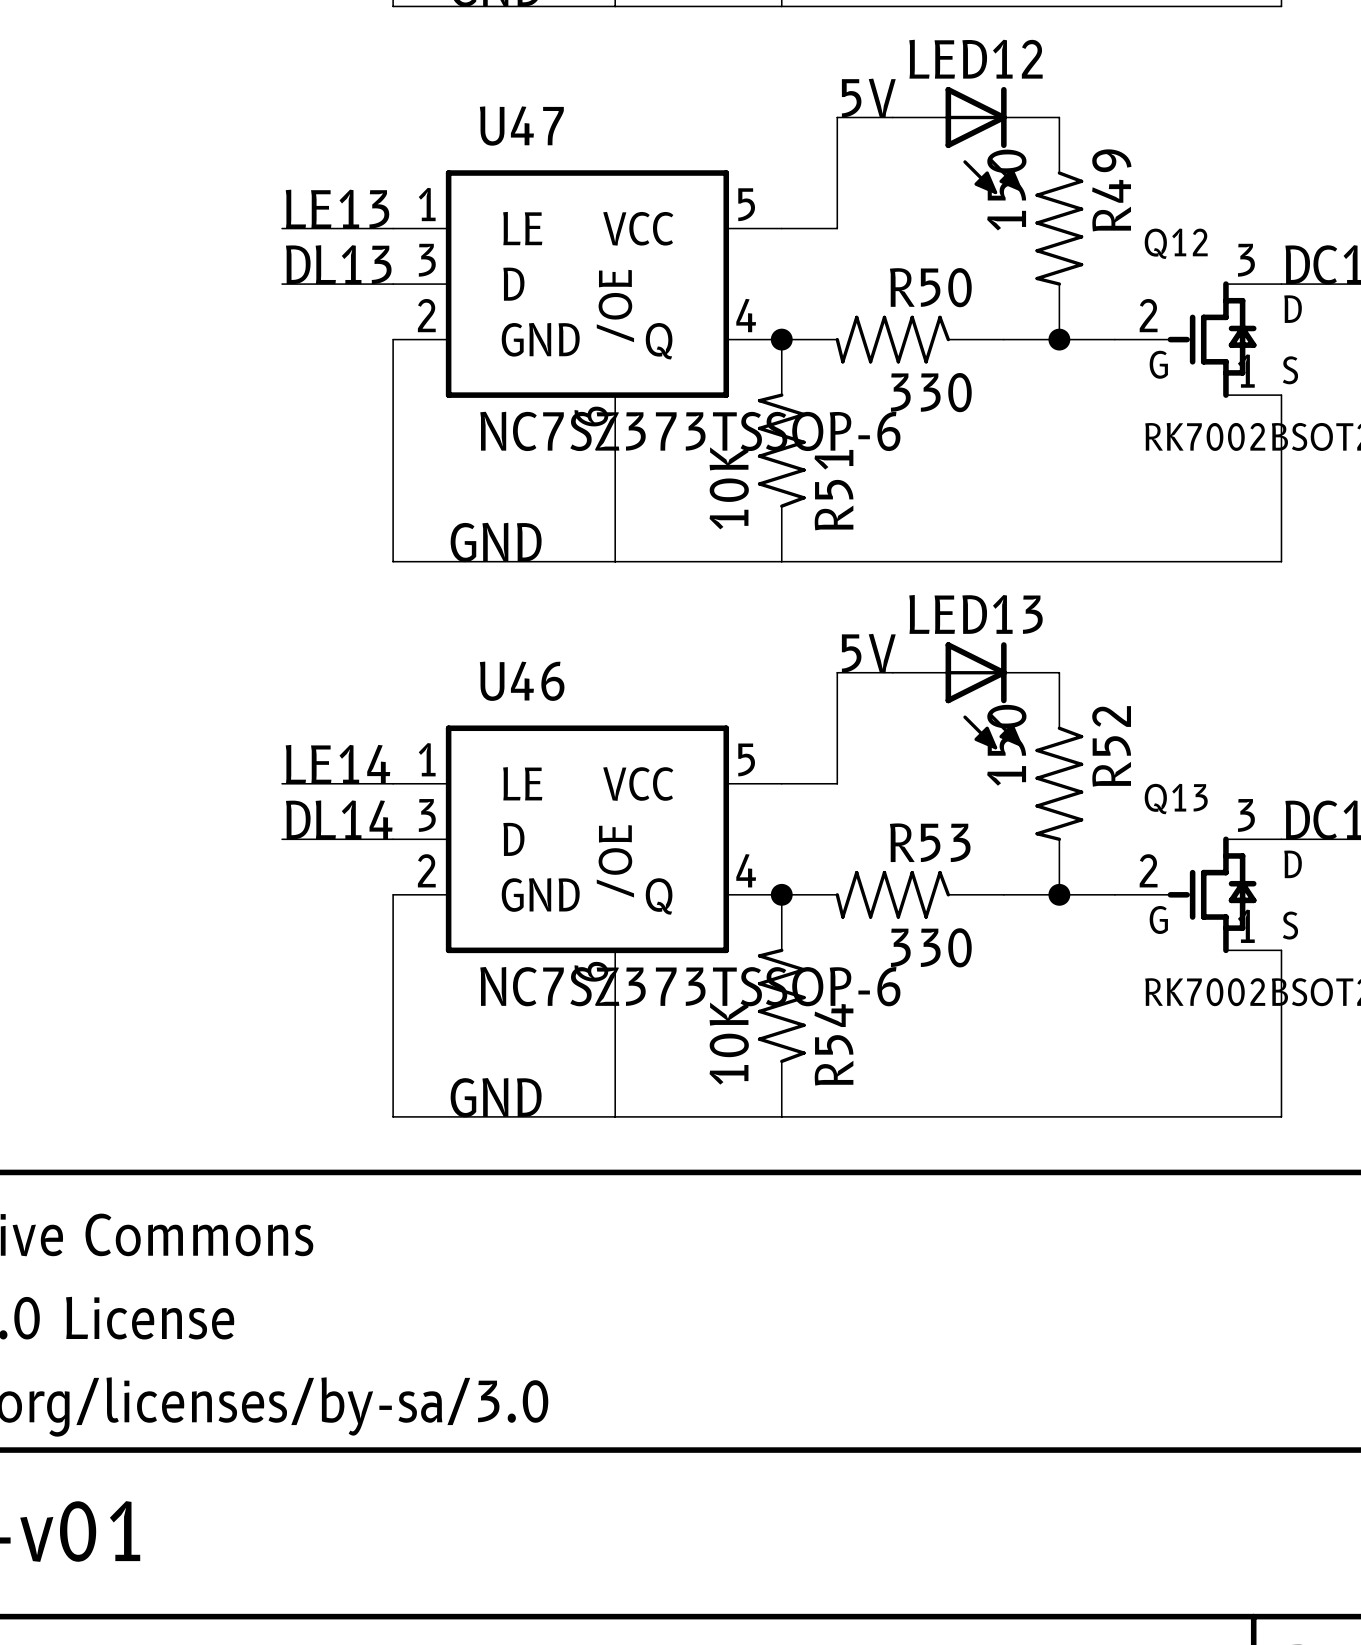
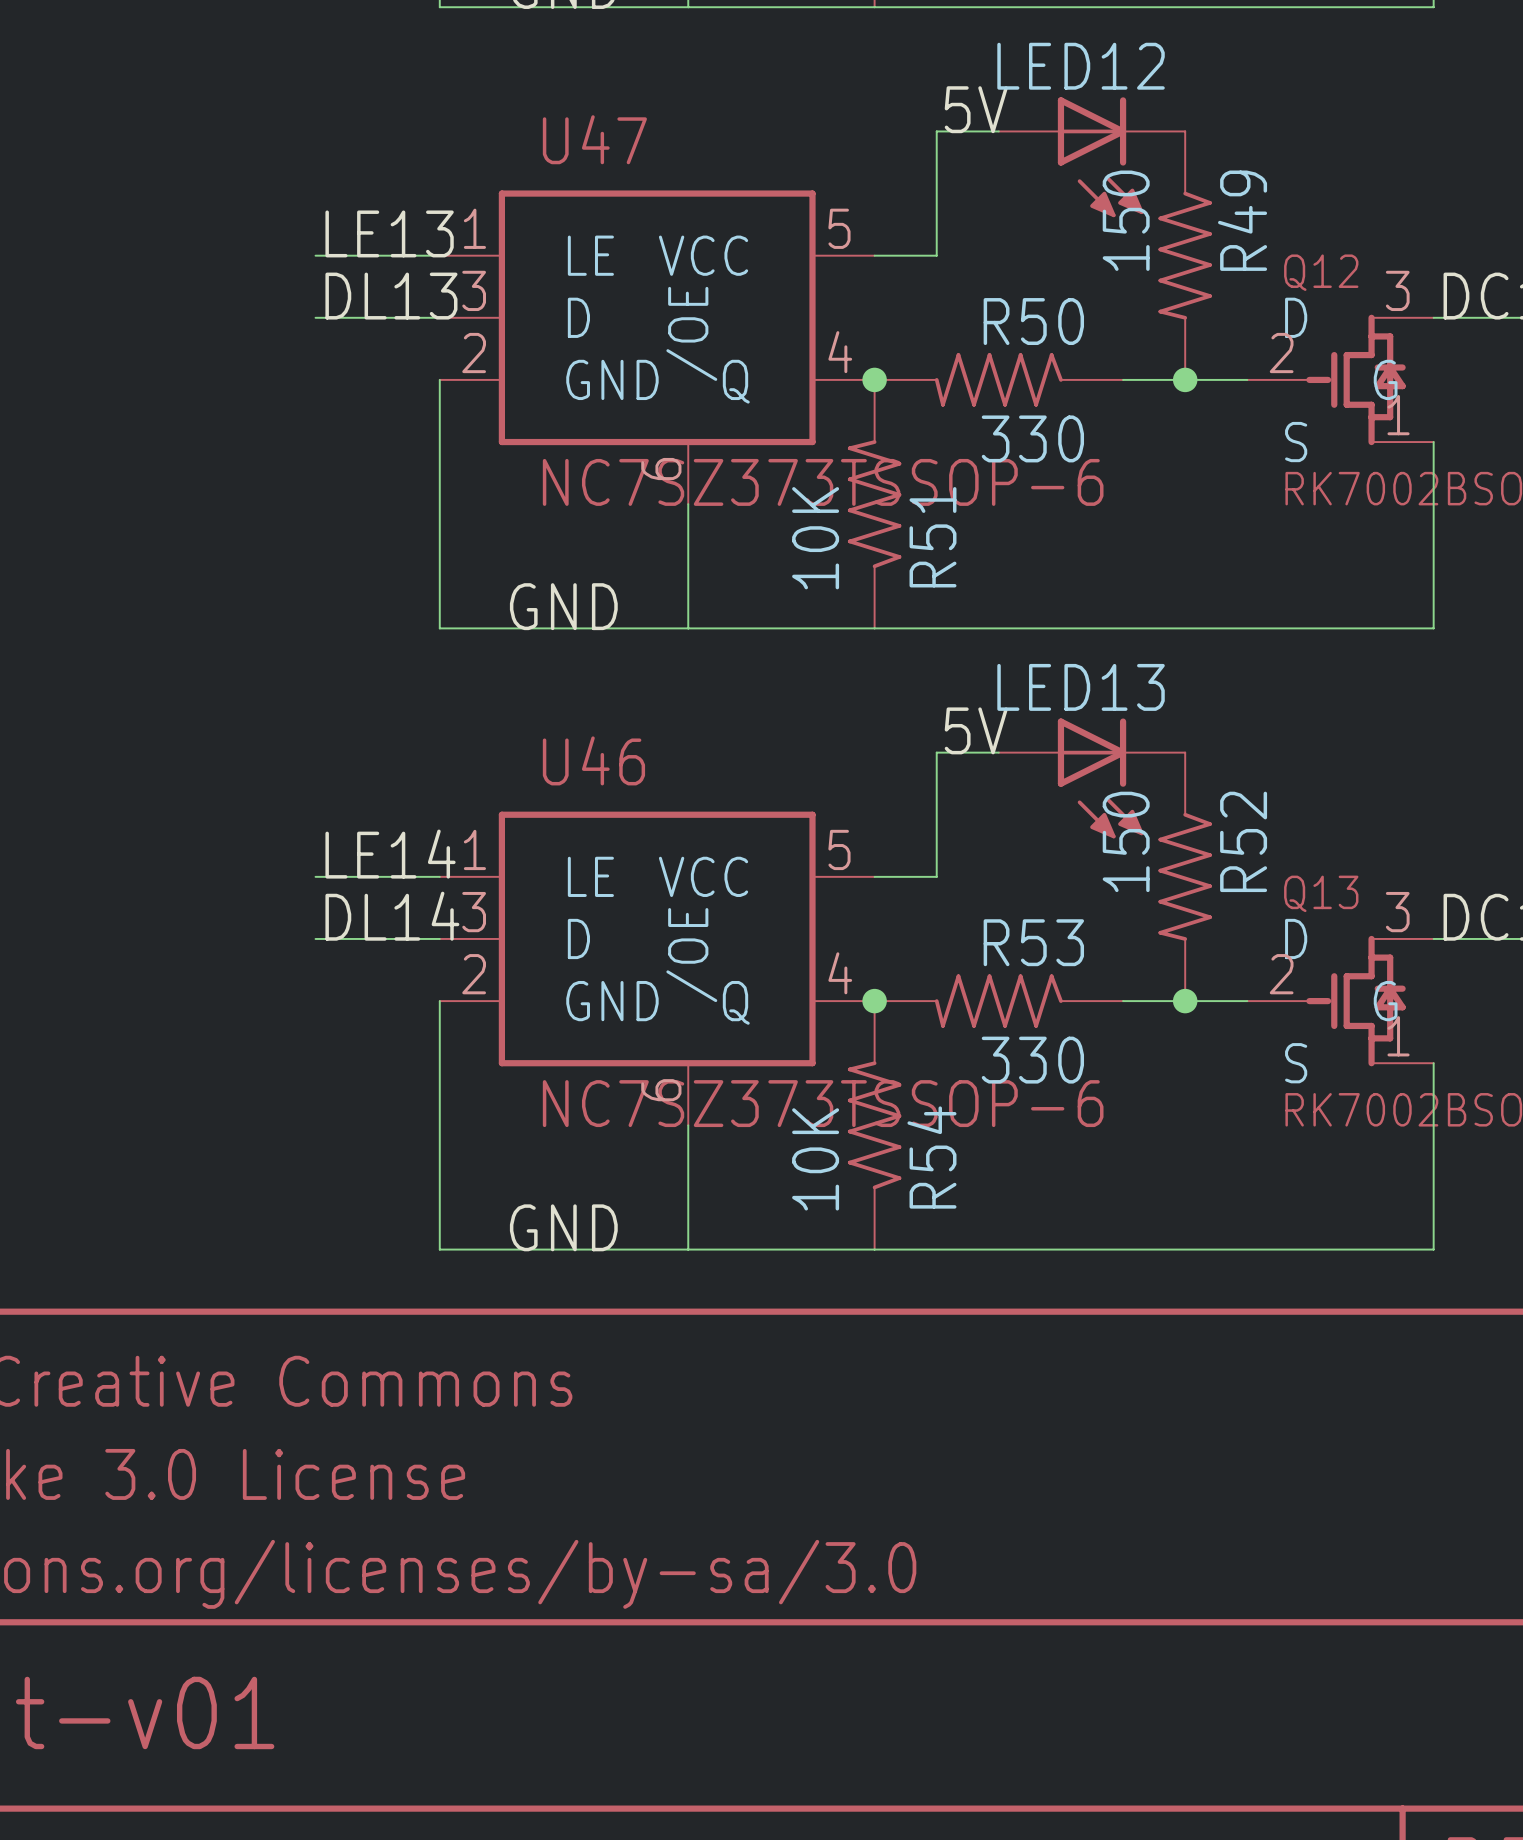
Q12 pin name: none -> D (1296, 317)
Q12 text: D (1293, 309) -> none
Q12 pin name: none -> G (1385, 379)
Q12 text: G (1158, 364) -> none
Q12 text: S (1290, 370) -> none
Q12 pin name: none -> S (1296, 442)
Q13 pin name: none -> D (1296, 938)
Q13 text: D (1293, 864) -> none
Q13 pin name: none -> G (1385, 1001)
Q13 text: G (1158, 919) -> none
Q13 text: S (1290, 925) -> none
Q13 pin name: none -> S (1296, 1063)

